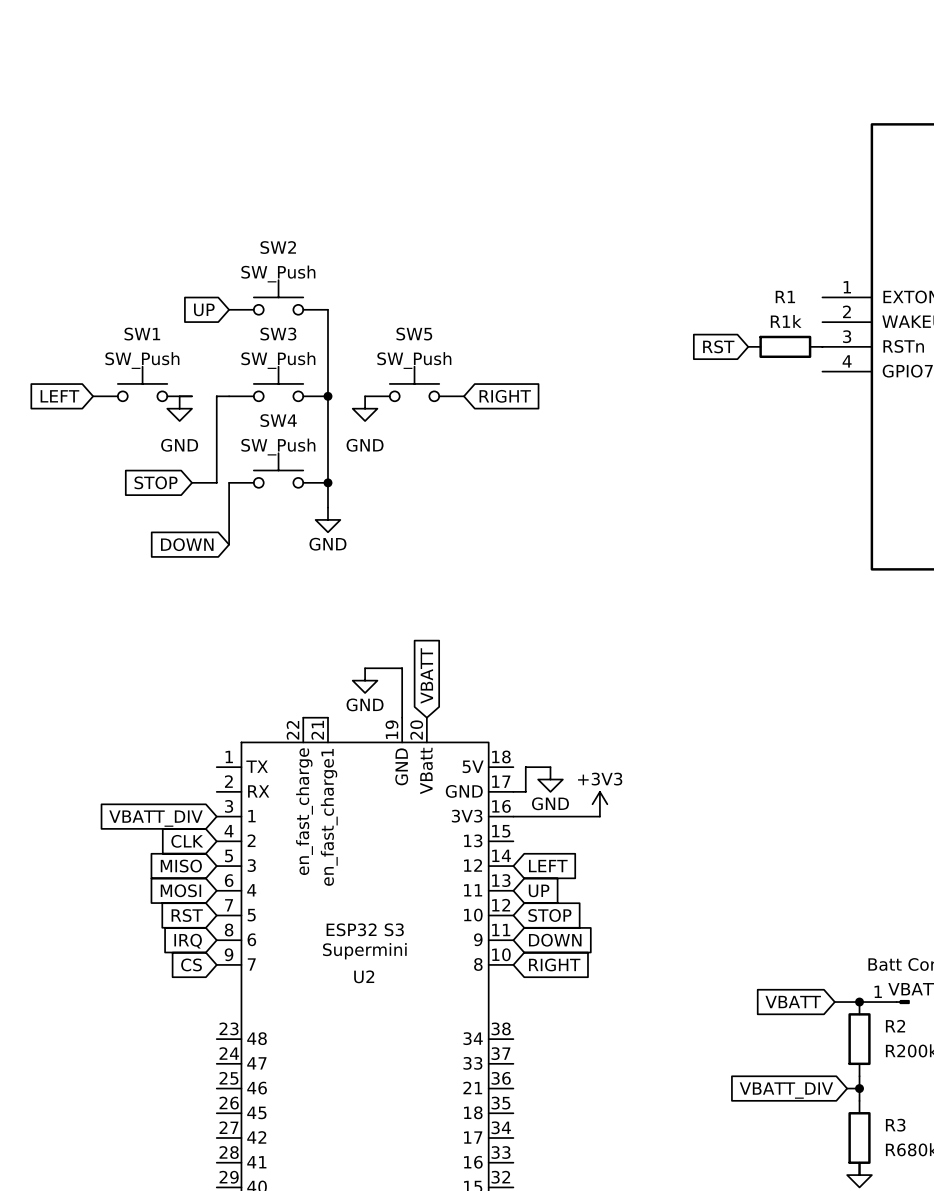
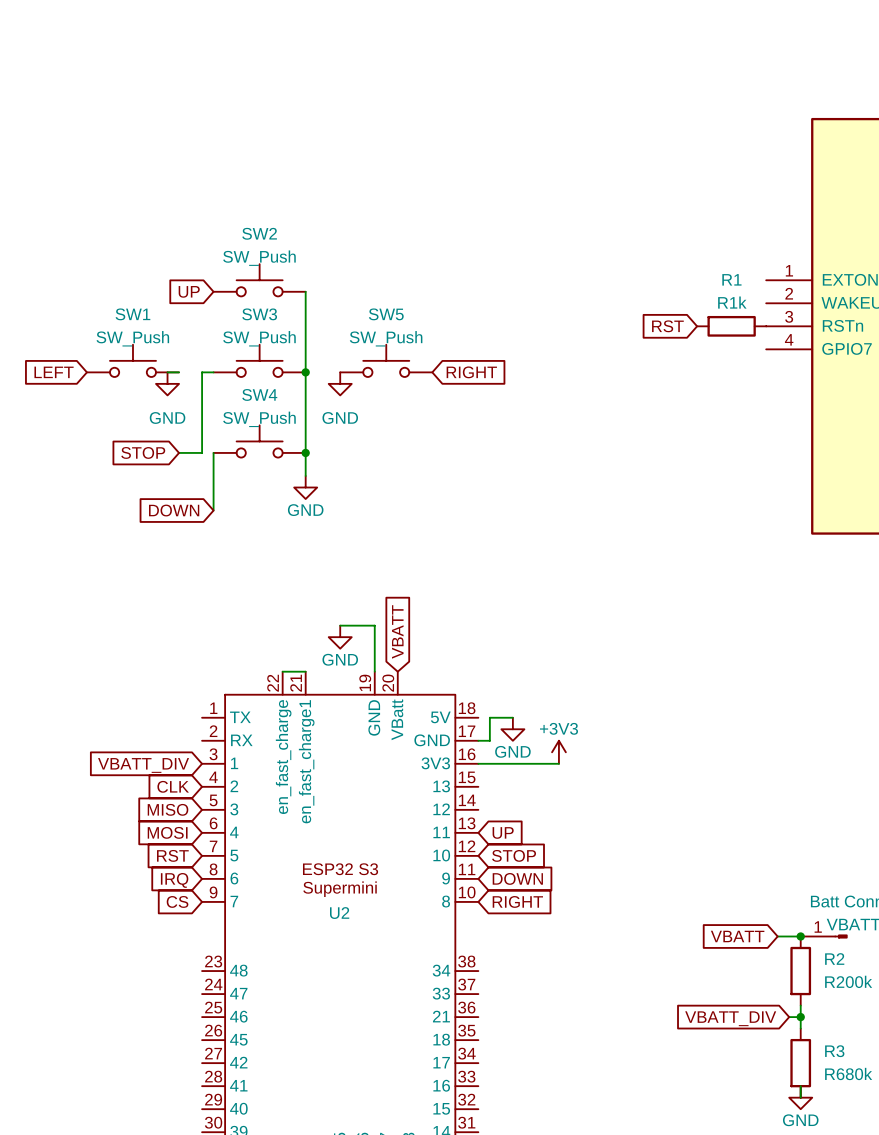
global label: LEFT (548, 866) -> none

